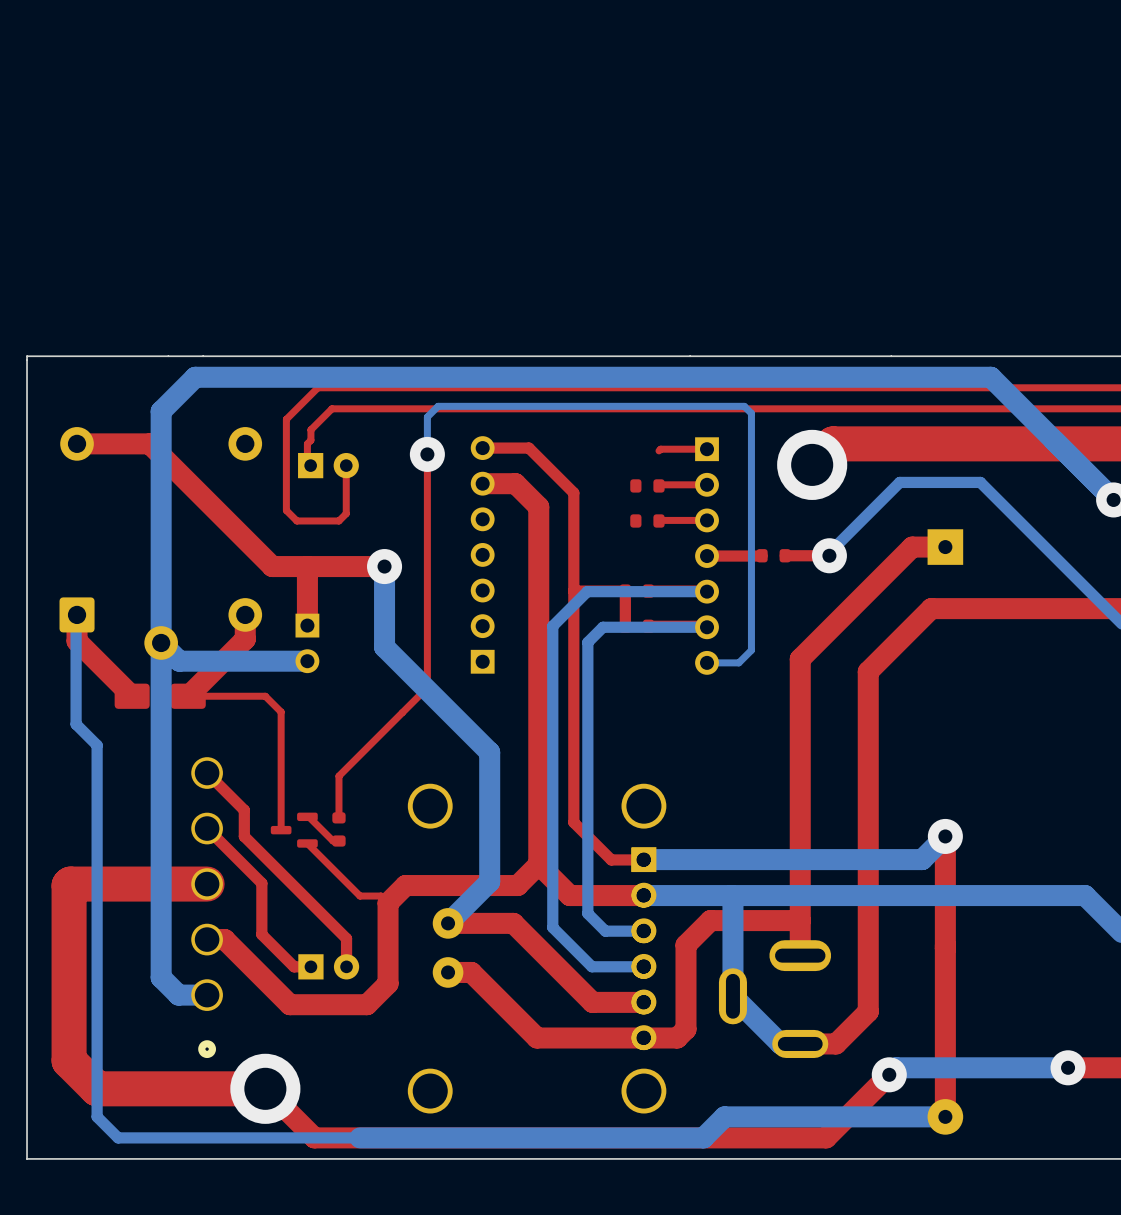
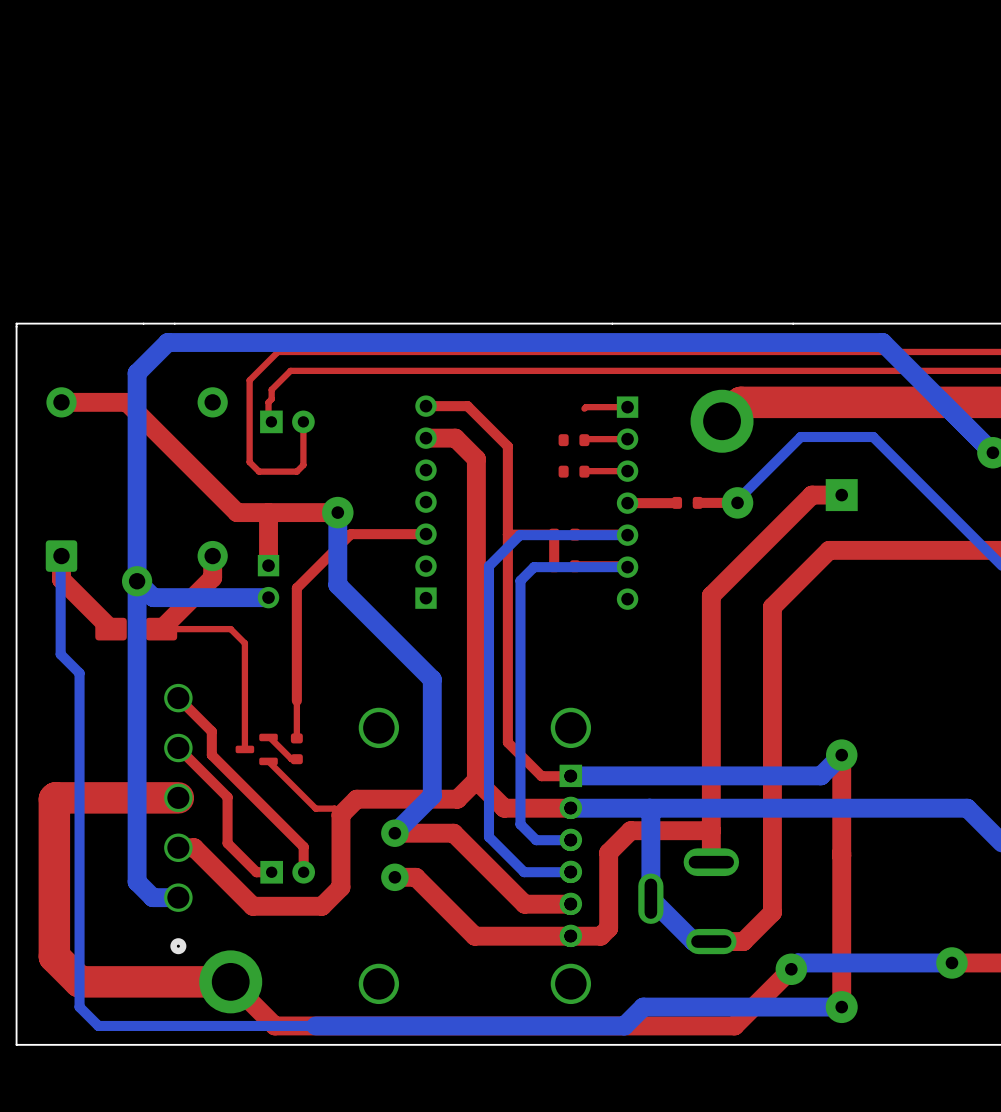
top track: (427, 454) (427, 687) (338, 776) -> (425, 534) (350, 534) (296, 588) (296, 700)
bottom track: (427, 454) (427, 417) (438, 406) (744, 406) (751, 413) (751, 650) (738, 662) (707, 662) -> none
via: (427, 454) -> none

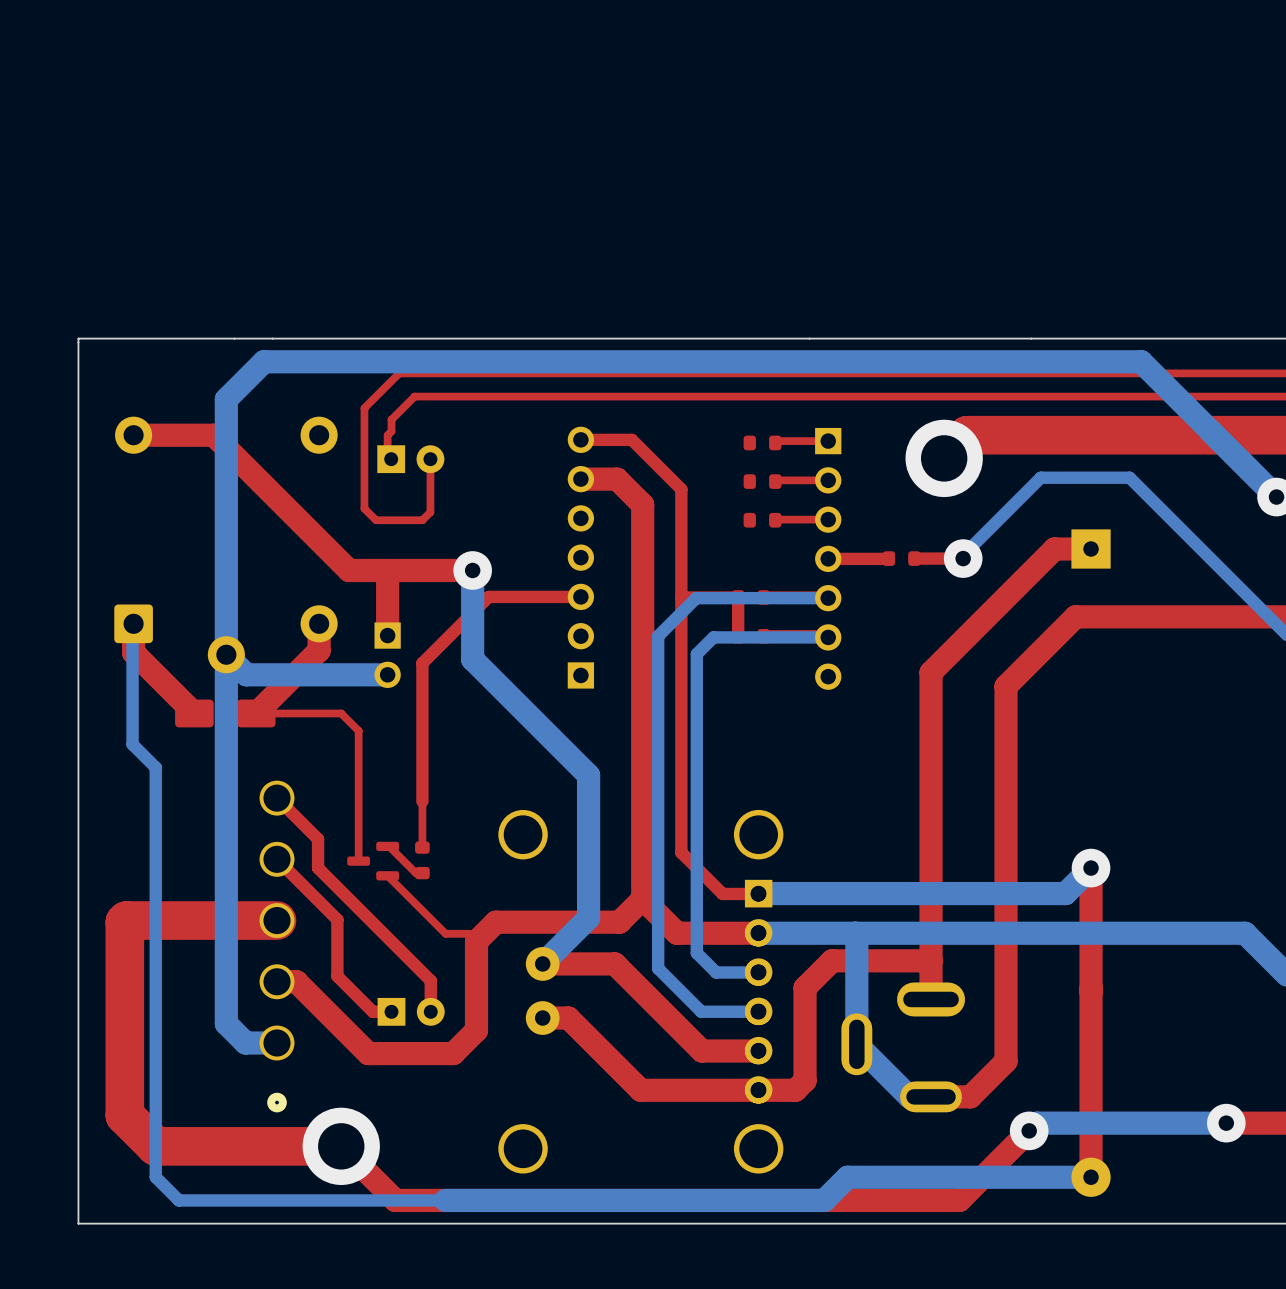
part: none -> (762, 442)

